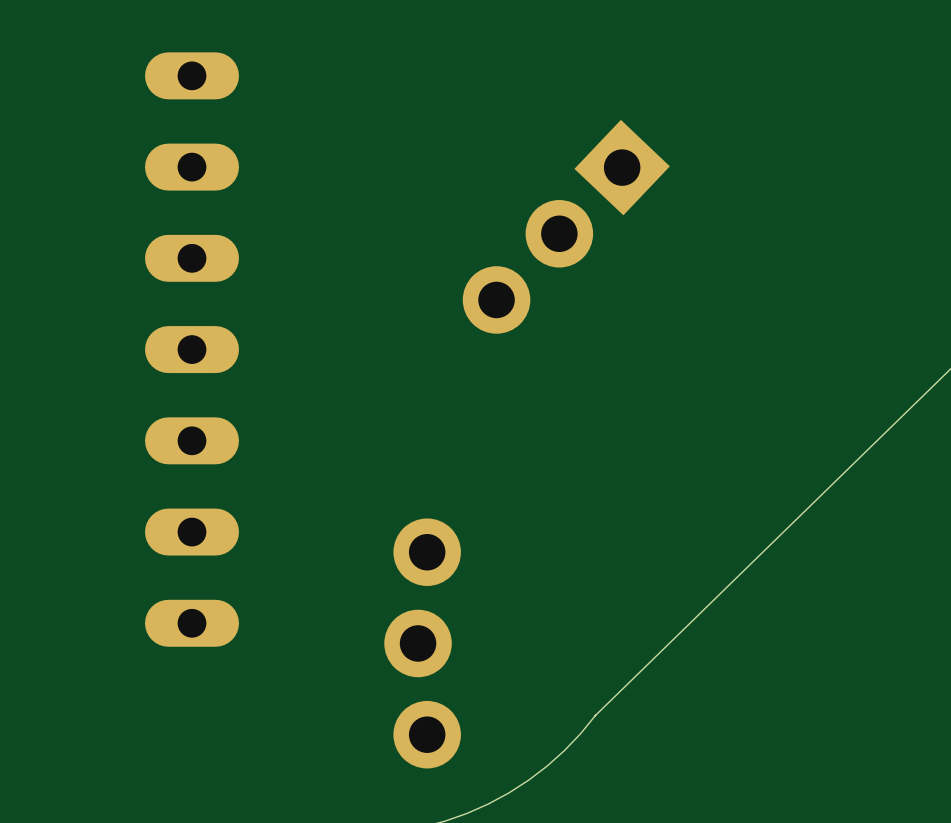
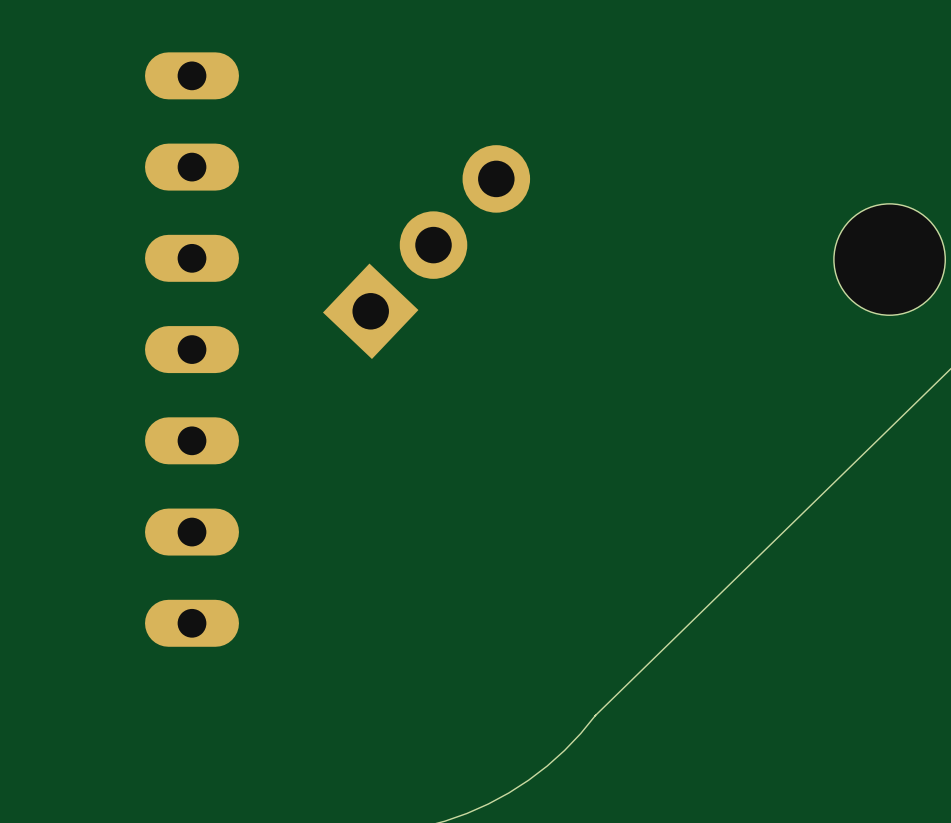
part rotation: 0° (566, 226) -> 180° (426, 252)
part position: (566, 226) -> (426, 252)
hole: none -> (889, 259)
part: (422, 643) -> none

